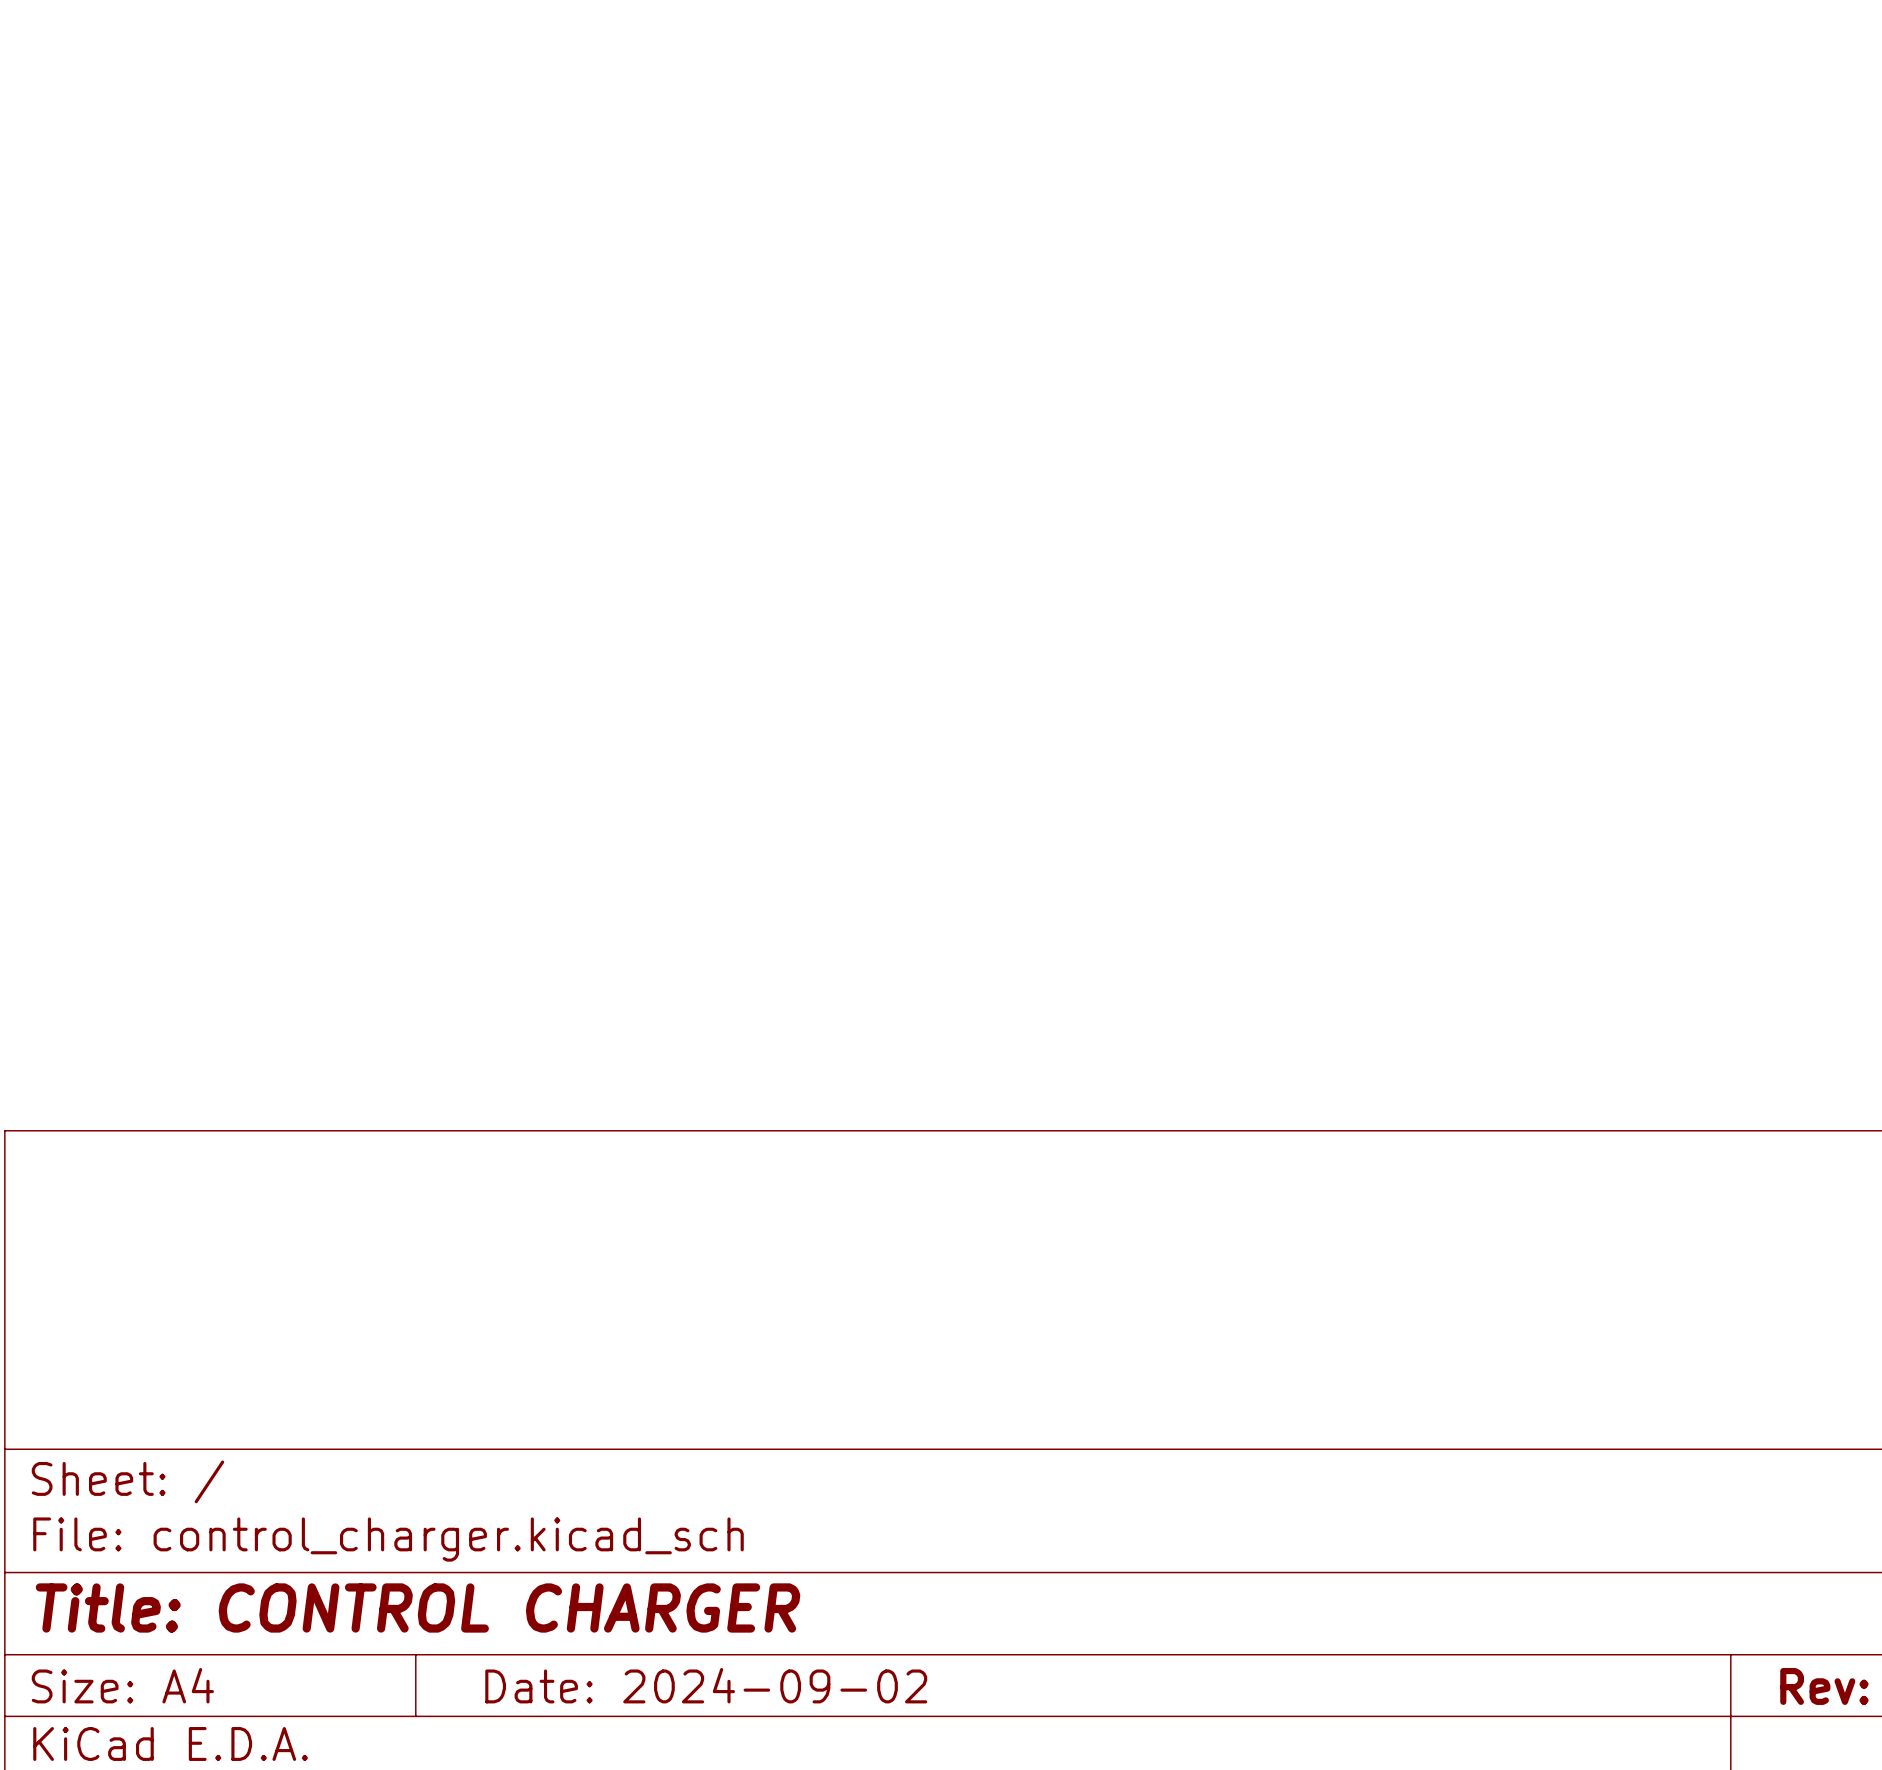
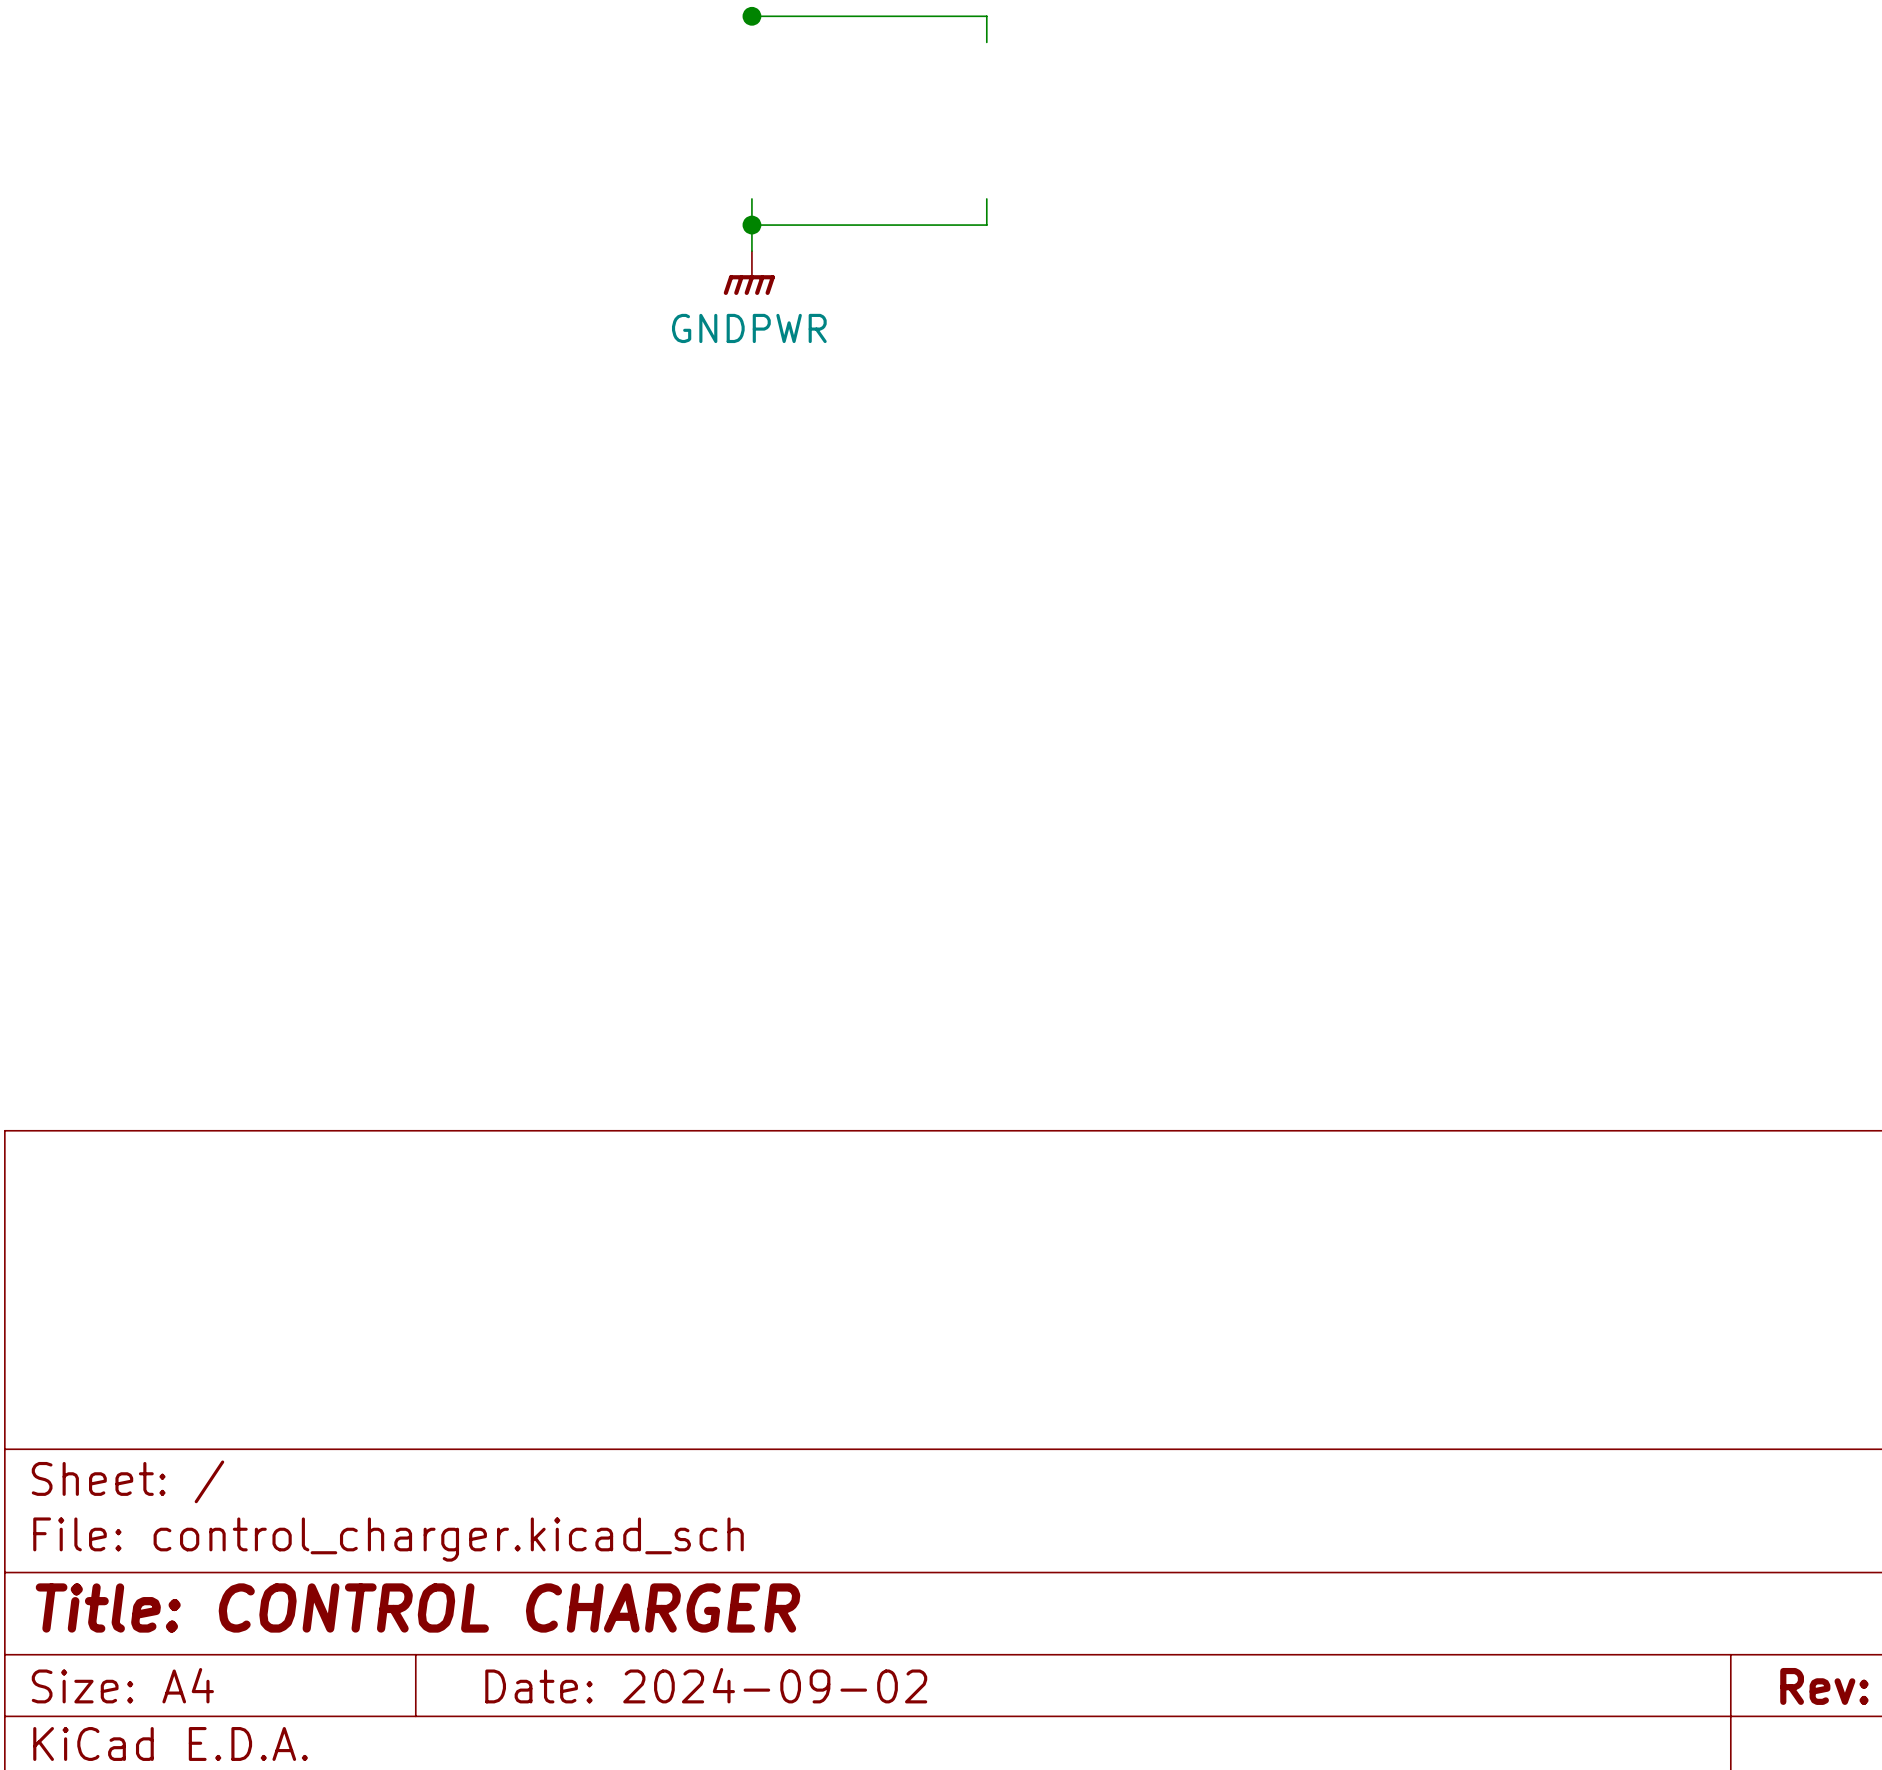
wire: none -> (751, 16) (986, 16) (986, 42)
junction: none -> (751, 16)
wire: none -> (751, 198) (751, 251)
wire: none -> (986, 198) (986, 225) (751, 225)
junction: none -> (751, 225)
power symbol: none -> GNDPWR (749, 273)

